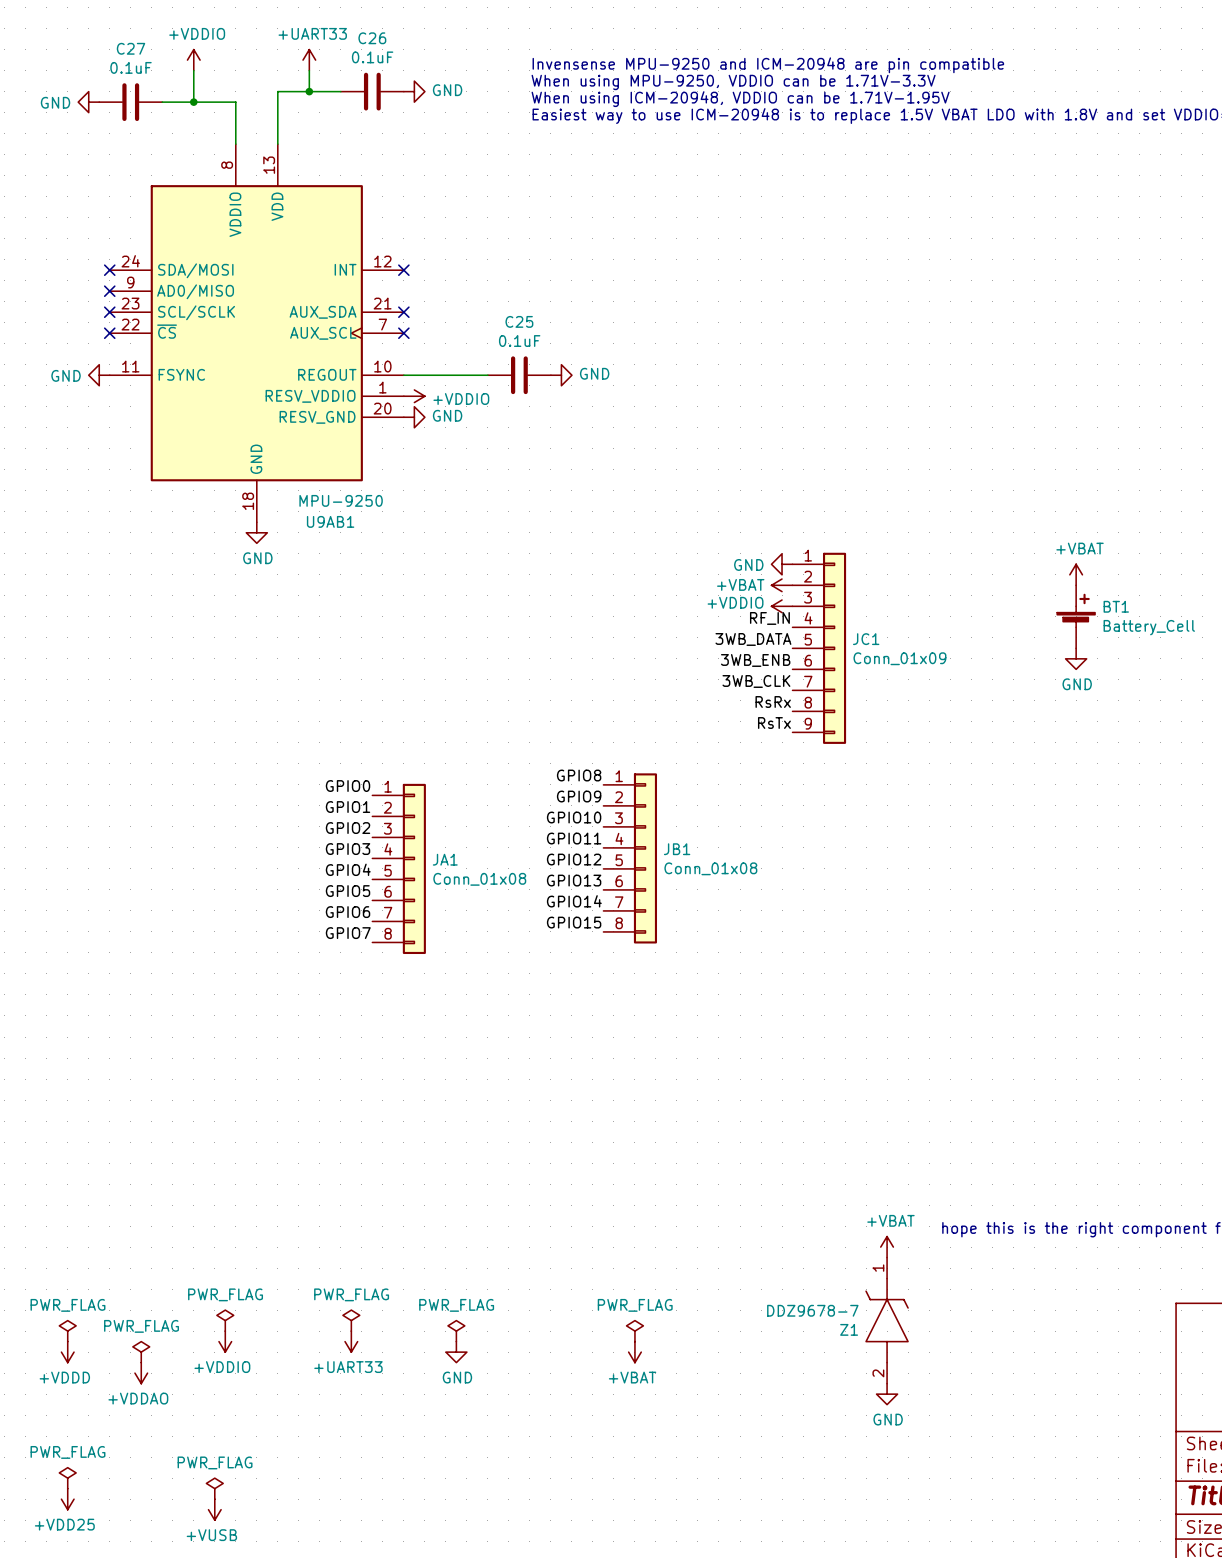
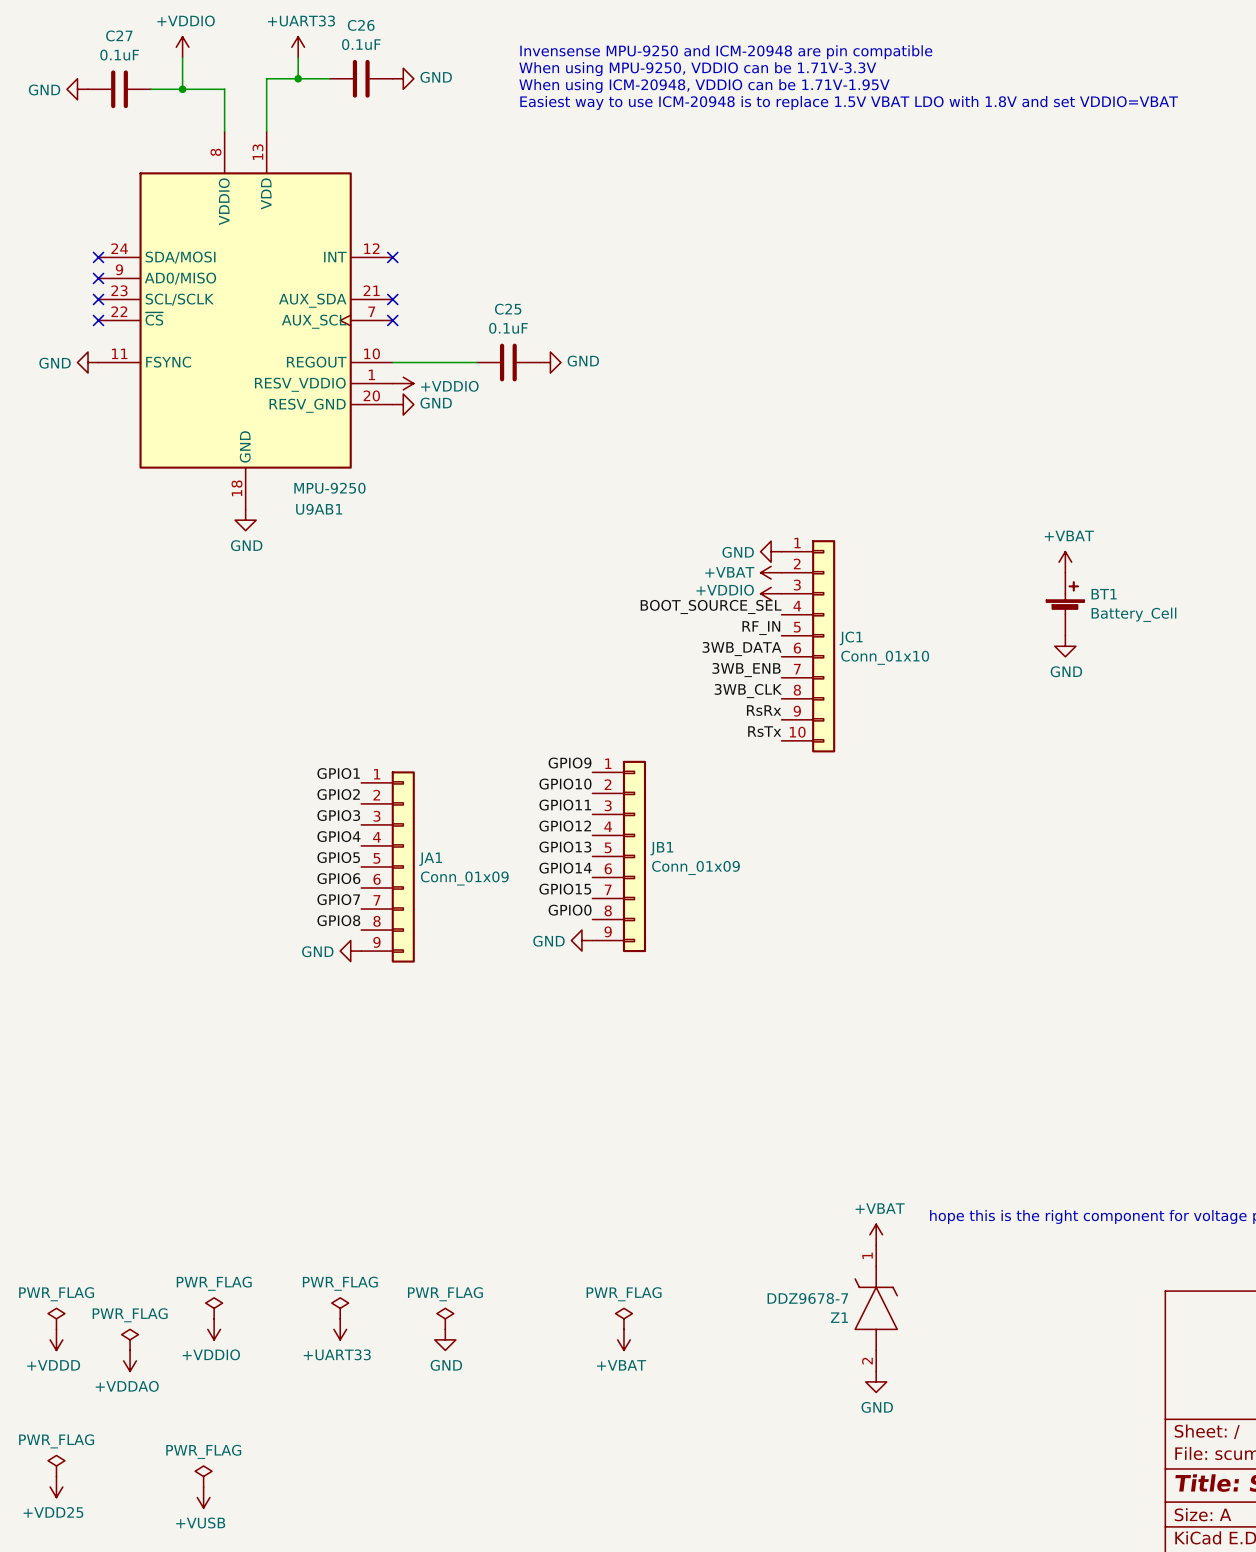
JC1 symbol: [792, 552, 847, 744] -> [781, 540, 836, 753]
label: RF_IN (769, 618) -> BOOT_SOURCE_SEL (711, 606)
label: 3WB_DATA (753, 639) -> RF_IN (761, 628)
JC1 value: Conn_01x09 (899, 658) -> Conn_01x10 (885, 657)
label: 3WB_ENB (755, 660) -> 3WB_DATA (742, 649)
label: 3WB_CLK (756, 681) -> 3WB_ENB (746, 670)
label: RsRx (773, 701) -> 3WB_CLK (748, 691)
label: RsTx (774, 723) -> RsRx (764, 710)
label: none -> RsTx (764, 731)
JB1 symbol: [603, 773, 658, 944] -> [592, 760, 647, 953]
label: GPIO8 (579, 775) -> GPIO9 (570, 763)
JA1 symbol: [372, 783, 426, 955] -> [361, 771, 415, 963]
label: GPIO0 (348, 786) -> GPIO1 (338, 773)
label: GPIO9 (579, 796) -> GPIO10 (565, 784)
label: GPIO1 (348, 807) -> GPIO2 (338, 794)
label: GPIO10 (574, 817) -> GPIO11 (565, 805)
label: GPIO2 (348, 828) -> GPIO3 (338, 815)
label: GPIO11 (574, 838) -> GPIO12 (565, 826)
label: GPIO3 (348, 849) -> GPIO4 (338, 836)
label: GPIO12 (574, 859) -> GPIO13 (565, 847)
JB1 value: Conn_01x08 (710, 868) -> Conn_01x09 (695, 867)
label: GPIO4 (348, 869) -> GPIO5 (338, 857)
JA1 value: Conn_01x08 (479, 879) -> Conn_01x09 (464, 878)
label: GPIO13 (574, 880) -> GPIO14 (565, 868)
label: GPIO5 (348, 891) -> GPIO6 (338, 878)
label: GPIO14 (574, 901) -> GPIO15 (565, 889)
label: GPIO6 (348, 912) -> GPIO7 (338, 899)
label: GPIO15 (574, 922) -> GPIO0 (570, 910)
label: GPIO7 (348, 933) -> GPIO8 (338, 920)
power symbol: none -> GND (581, 940)
power symbol: none -> GND (350, 951)

